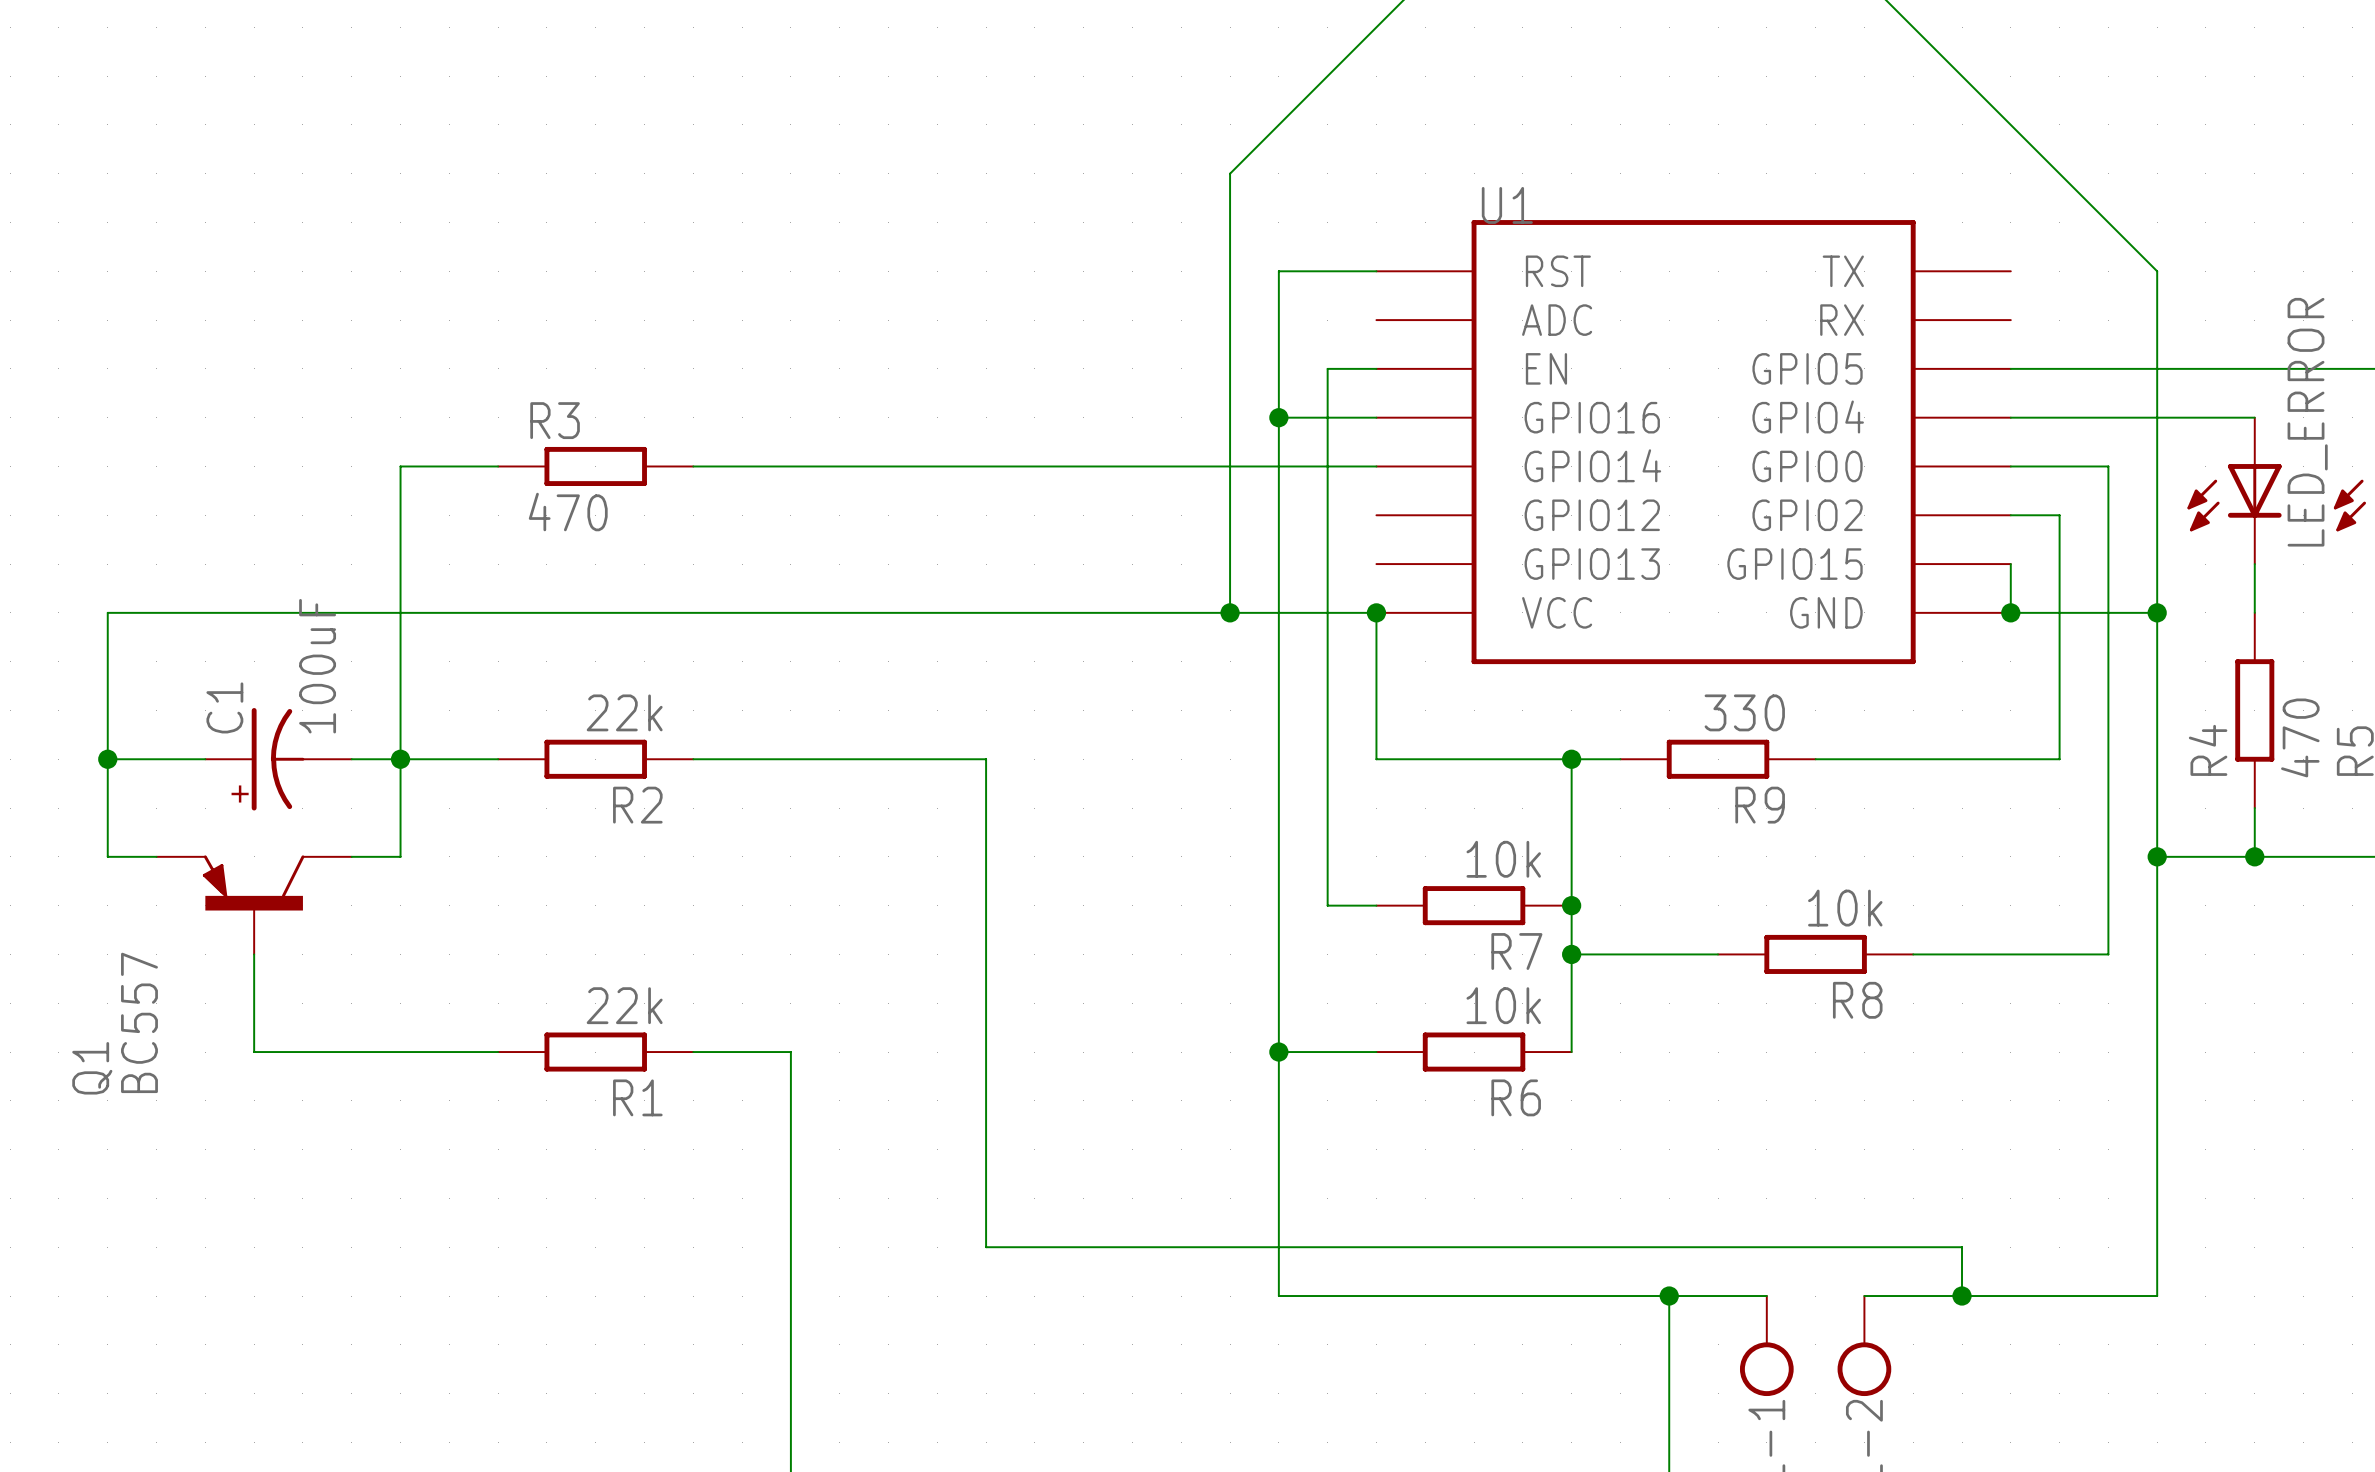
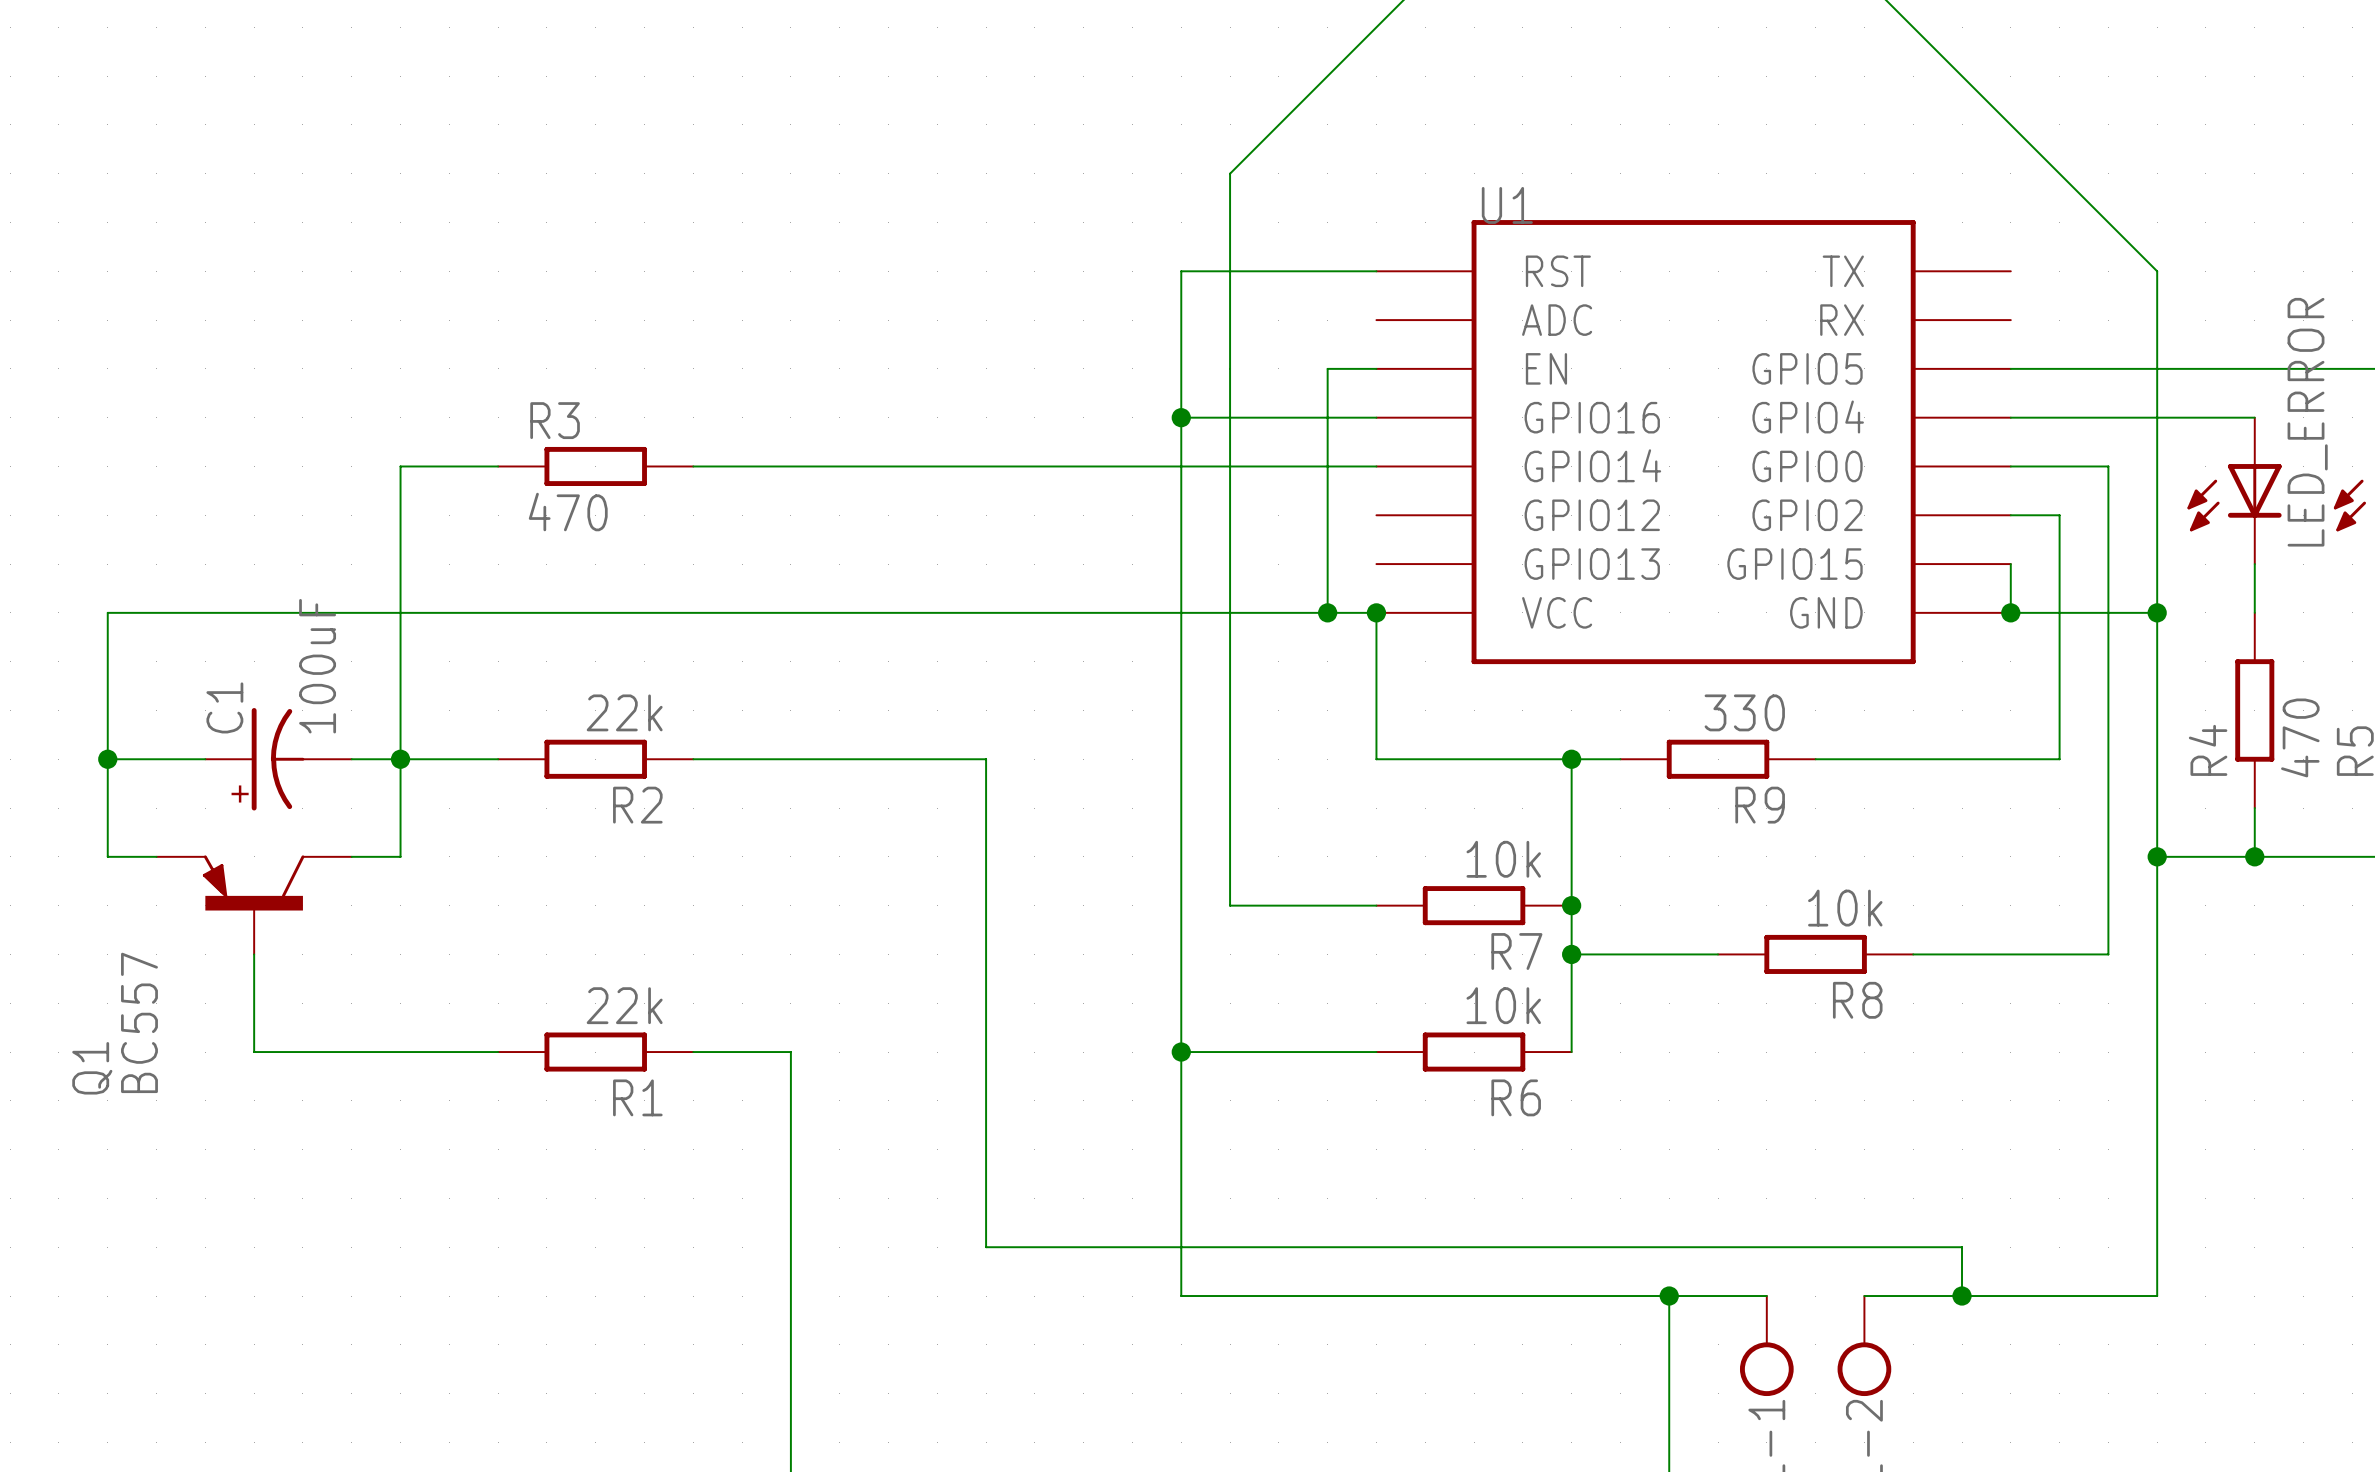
wire: (1278, 271) (1278, 1296) -> (1278, 271) (1181, 271) (1181, 1296) (1278, 1296)
wire: none -> (1181, 417) (1278, 417)
junction position: (1278, 417) -> (1181, 417)
junction position: (1230, 612) -> (1327, 612)
wire: (1327, 612) (1327, 905) -> (1230, 612) (1230, 905) (1327, 905)
wire: none -> (1181, 1052) (1278, 1052)
junction position: (1278, 1052) -> (1181, 1052)

